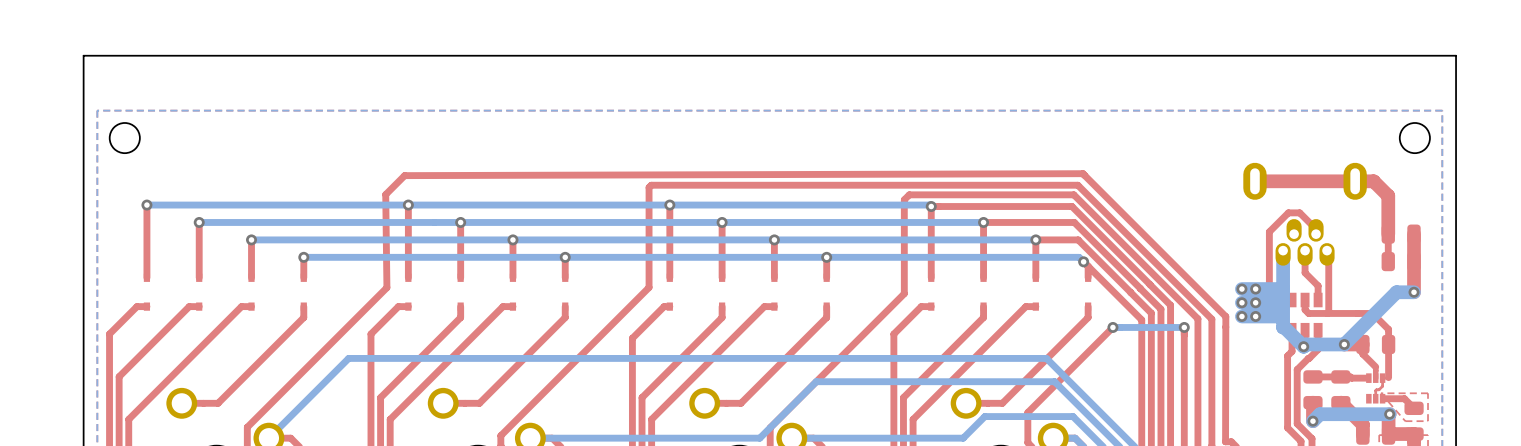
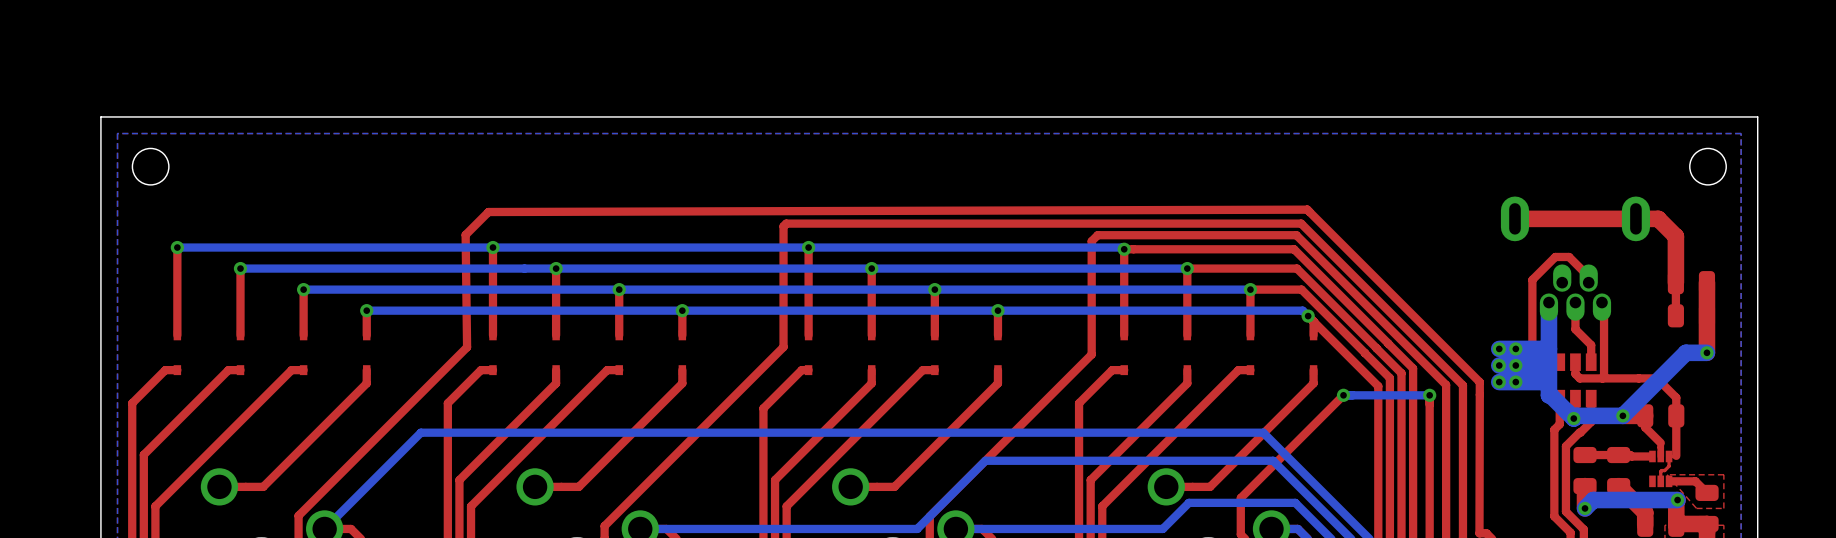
board edge: (1456, 96) (1456, 55) (83, 55) (83, 96) -> (1757, 116) (100, 116)

